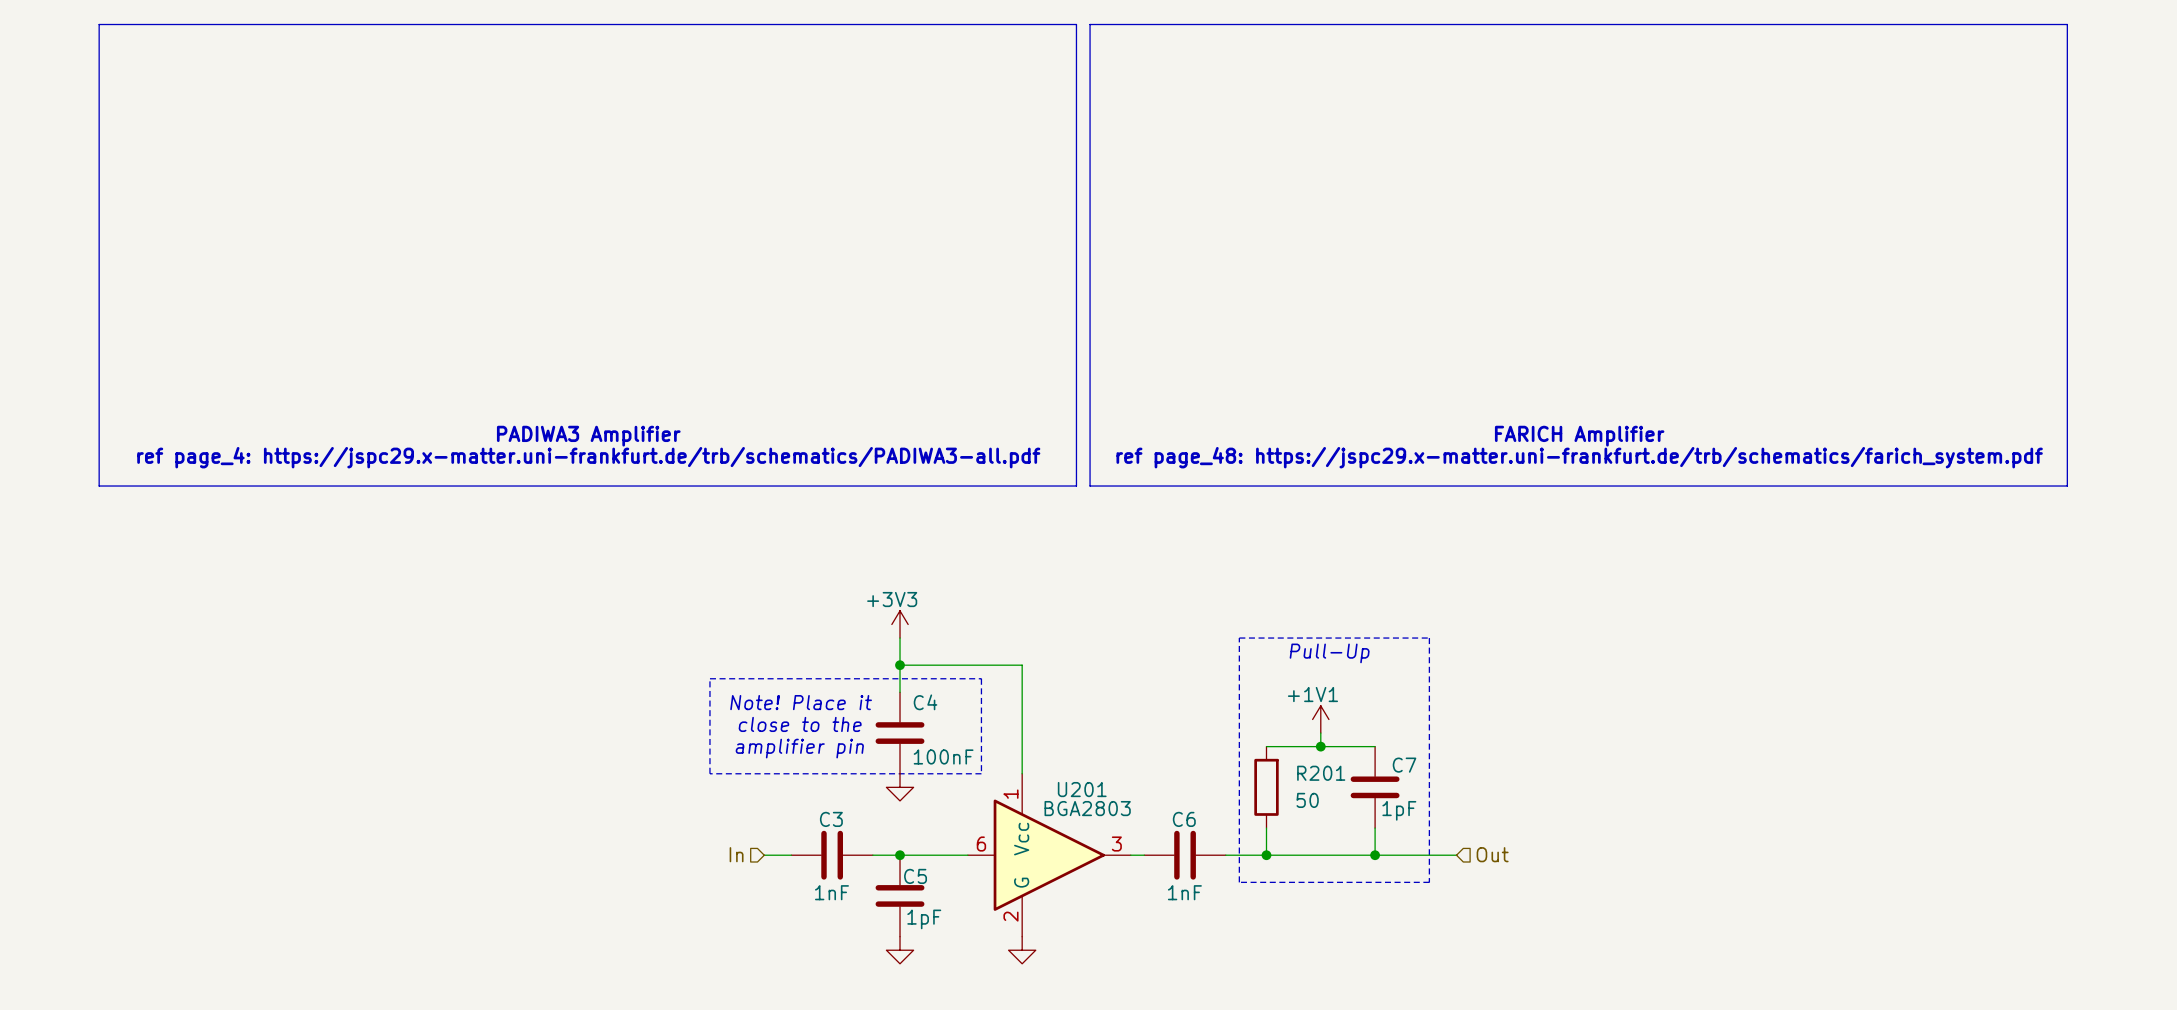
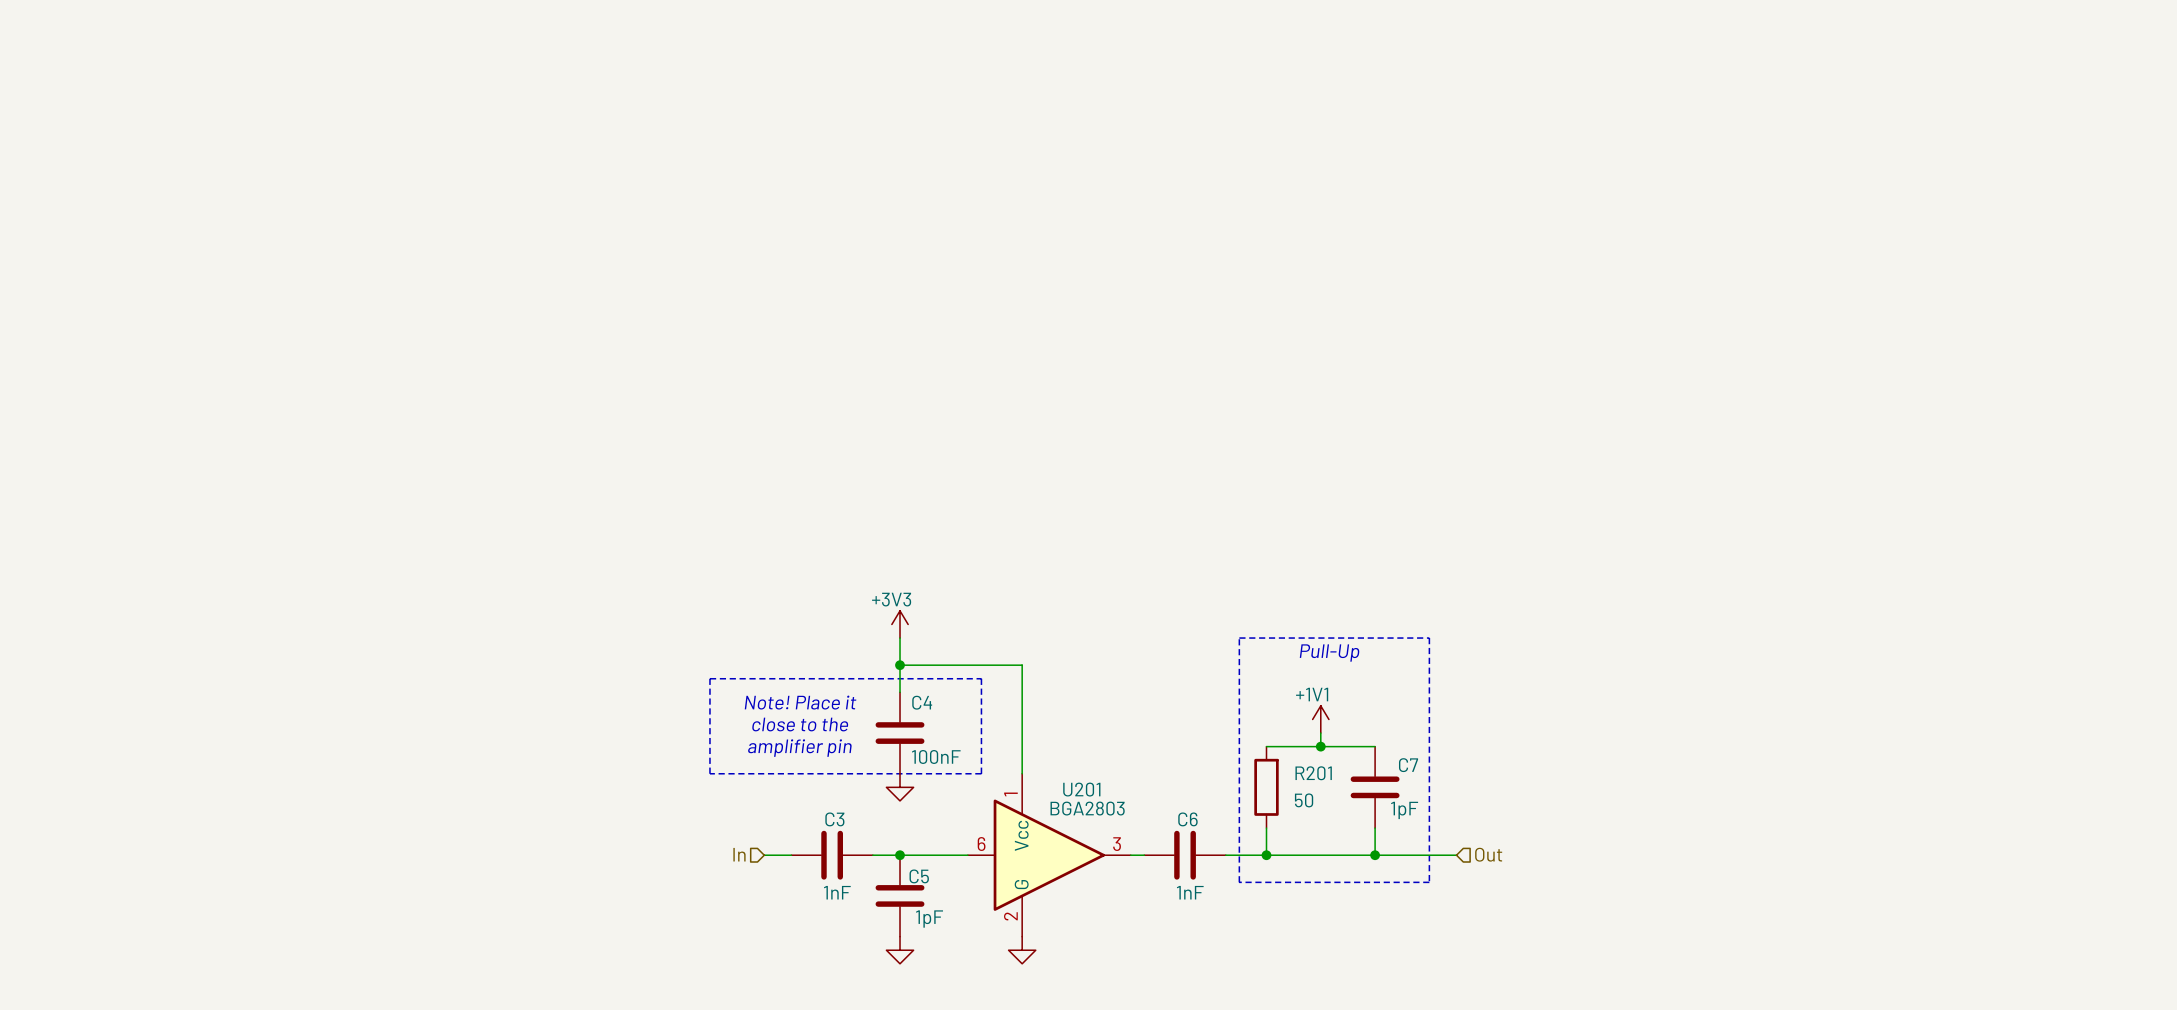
line: (99, 24) (1076, 24) (1076, 486) (99, 486) (99, 24) -> none
line: (1090, 24) (2067, 24) (2067, 486) (1090, 486) (1090, 24) -> none
text: PADIWA3 Amplifier (588, 436) -> none
text: FARICH Amplifier (1579, 436) -> none
text: ref page_4: https://jspc29.x-matter.uni-frankfurt.de/trb/schematics/PADIWA3-all.pdf (588, 457) -> none
text: ref page_48: https://jspc29.x-matter.uni-frankfurt.de/trb/schematics/farich_system.pdf (1579, 457) -> none

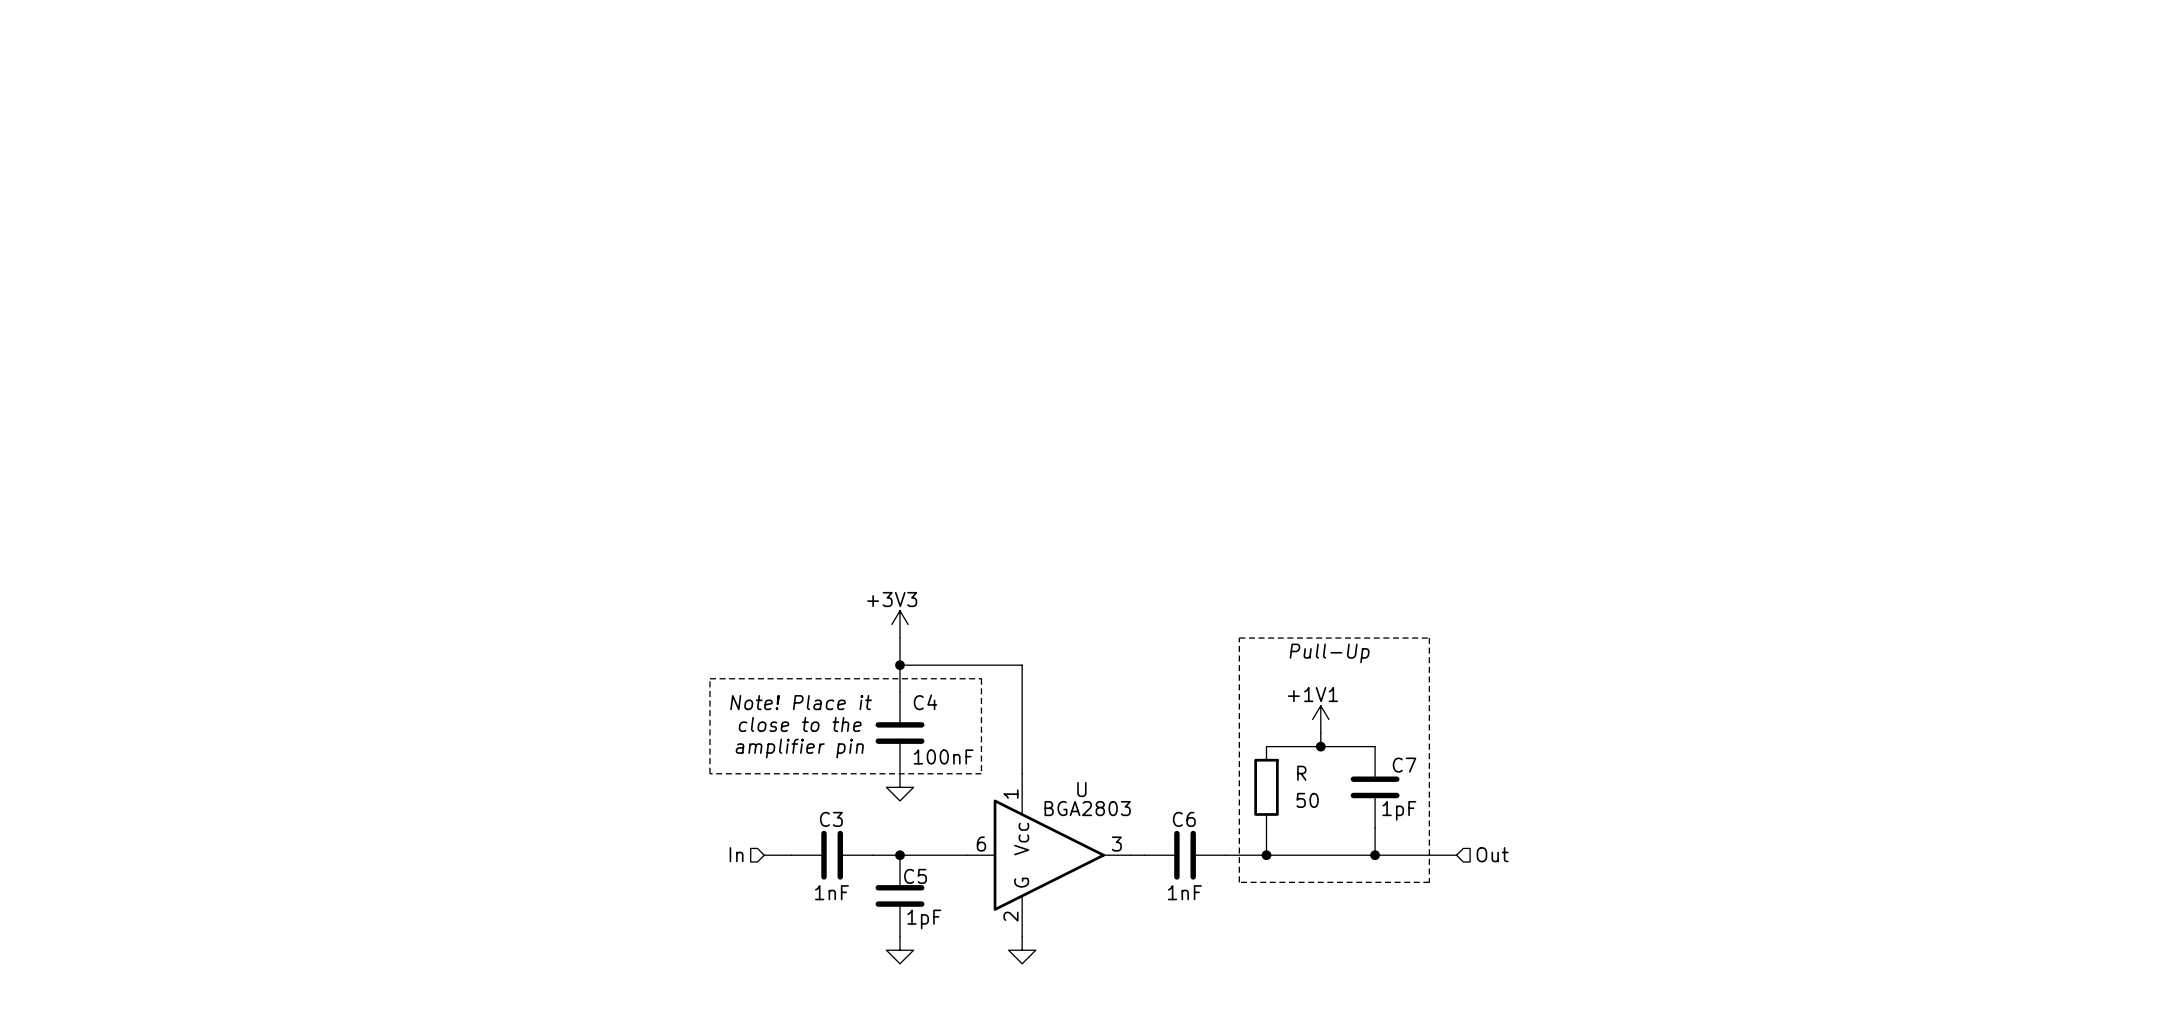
R201 name: R201 (1313, 773) -> R (1301, 773)
U201 name: U201 (1081, 789) -> U (1081, 789)

